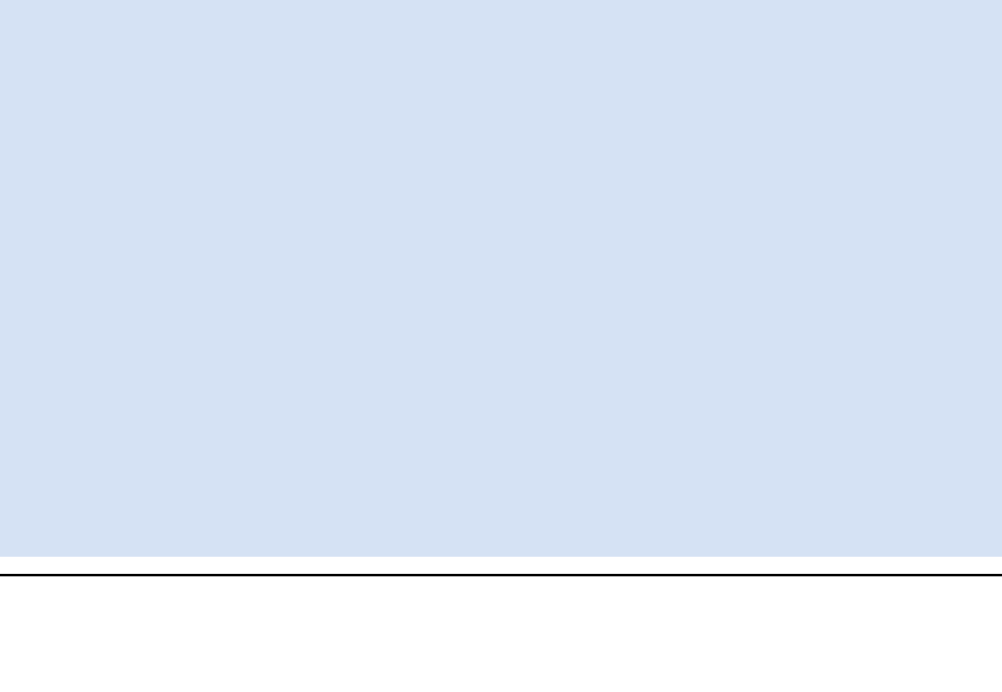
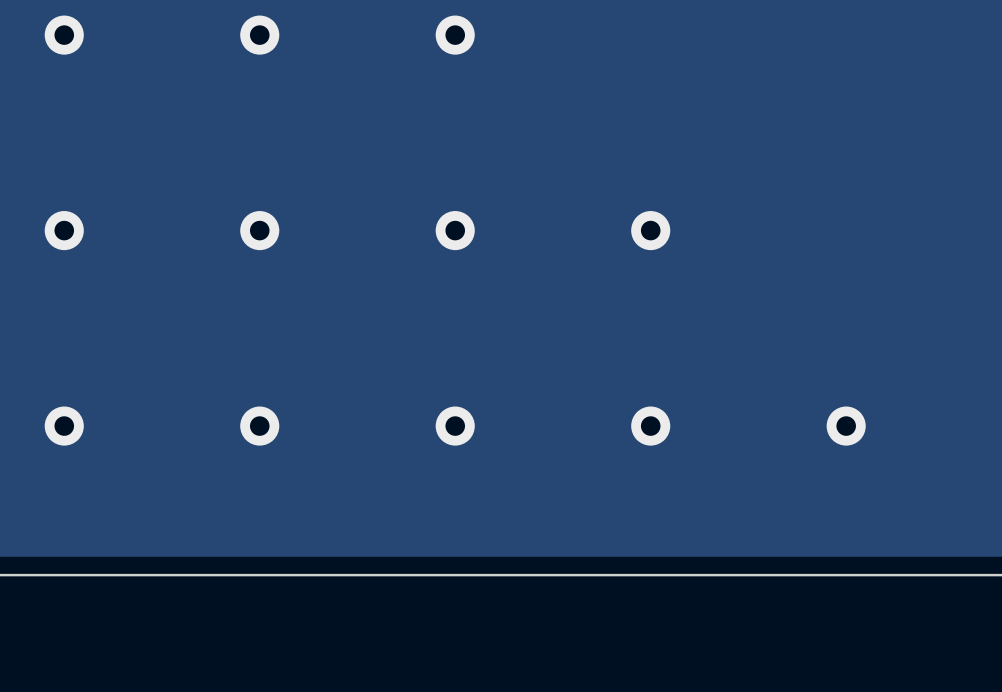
via: none -> (64, 35)
via: none -> (259, 35)
via: none -> (455, 35)
via: none -> (64, 230)
via: none -> (259, 230)
via: none -> (455, 230)
via: none -> (650, 230)
via: none -> (64, 426)
via: none -> (259, 426)
via: none -> (455, 426)
via: none -> (650, 426)
via: none -> (846, 426)

